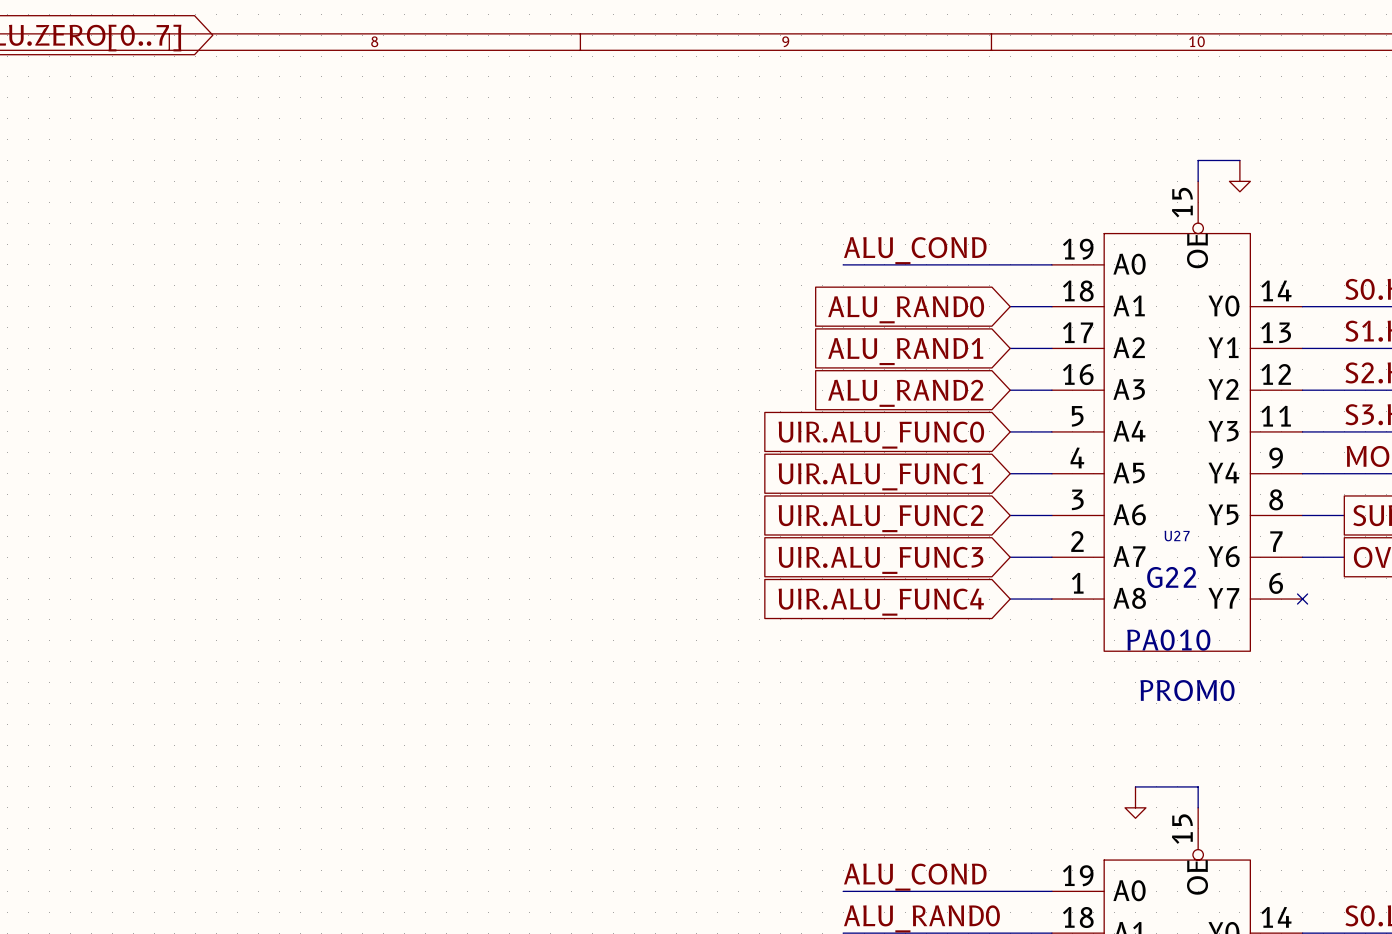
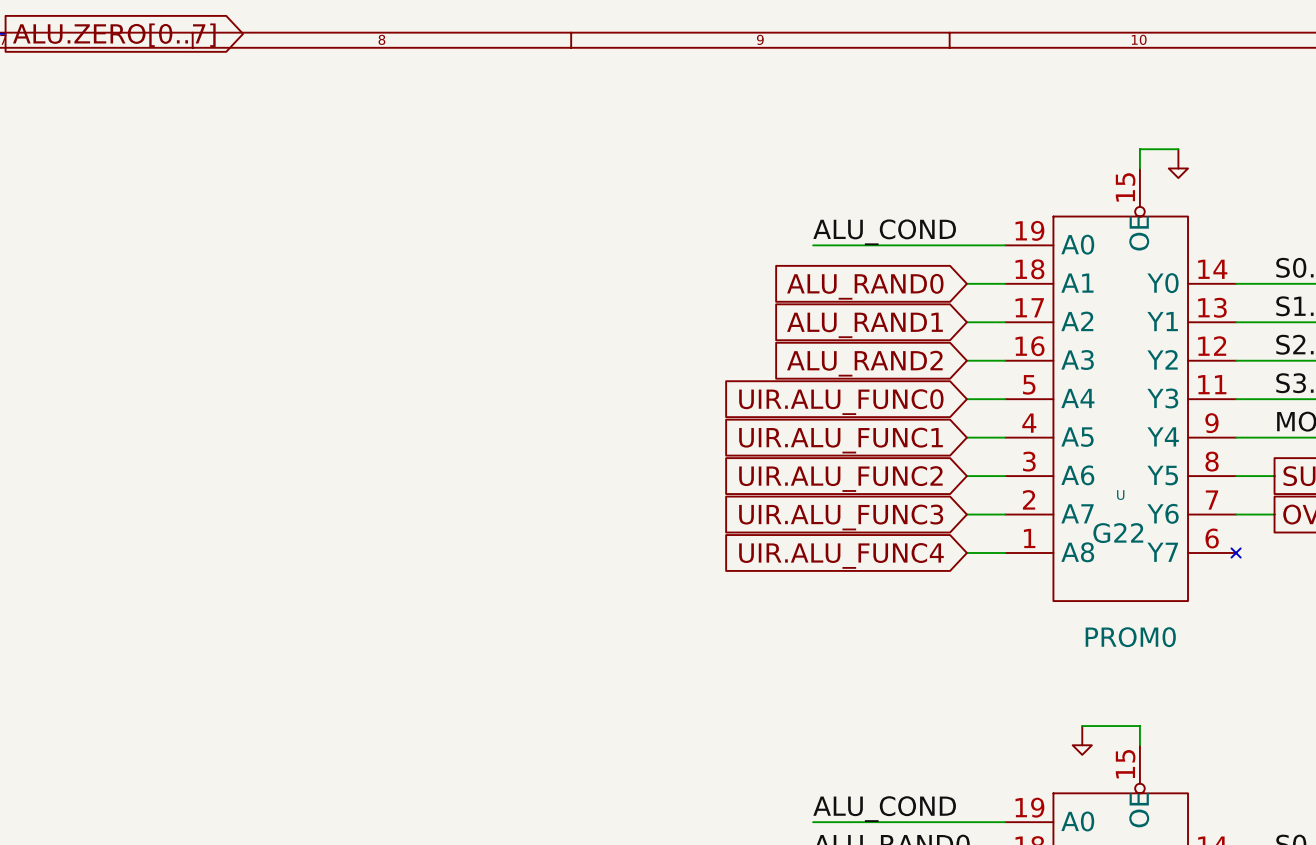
U27 name: U27 (1177, 536) -> U (1120, 495)
U27 value: PA010 (1168, 640) -> none

